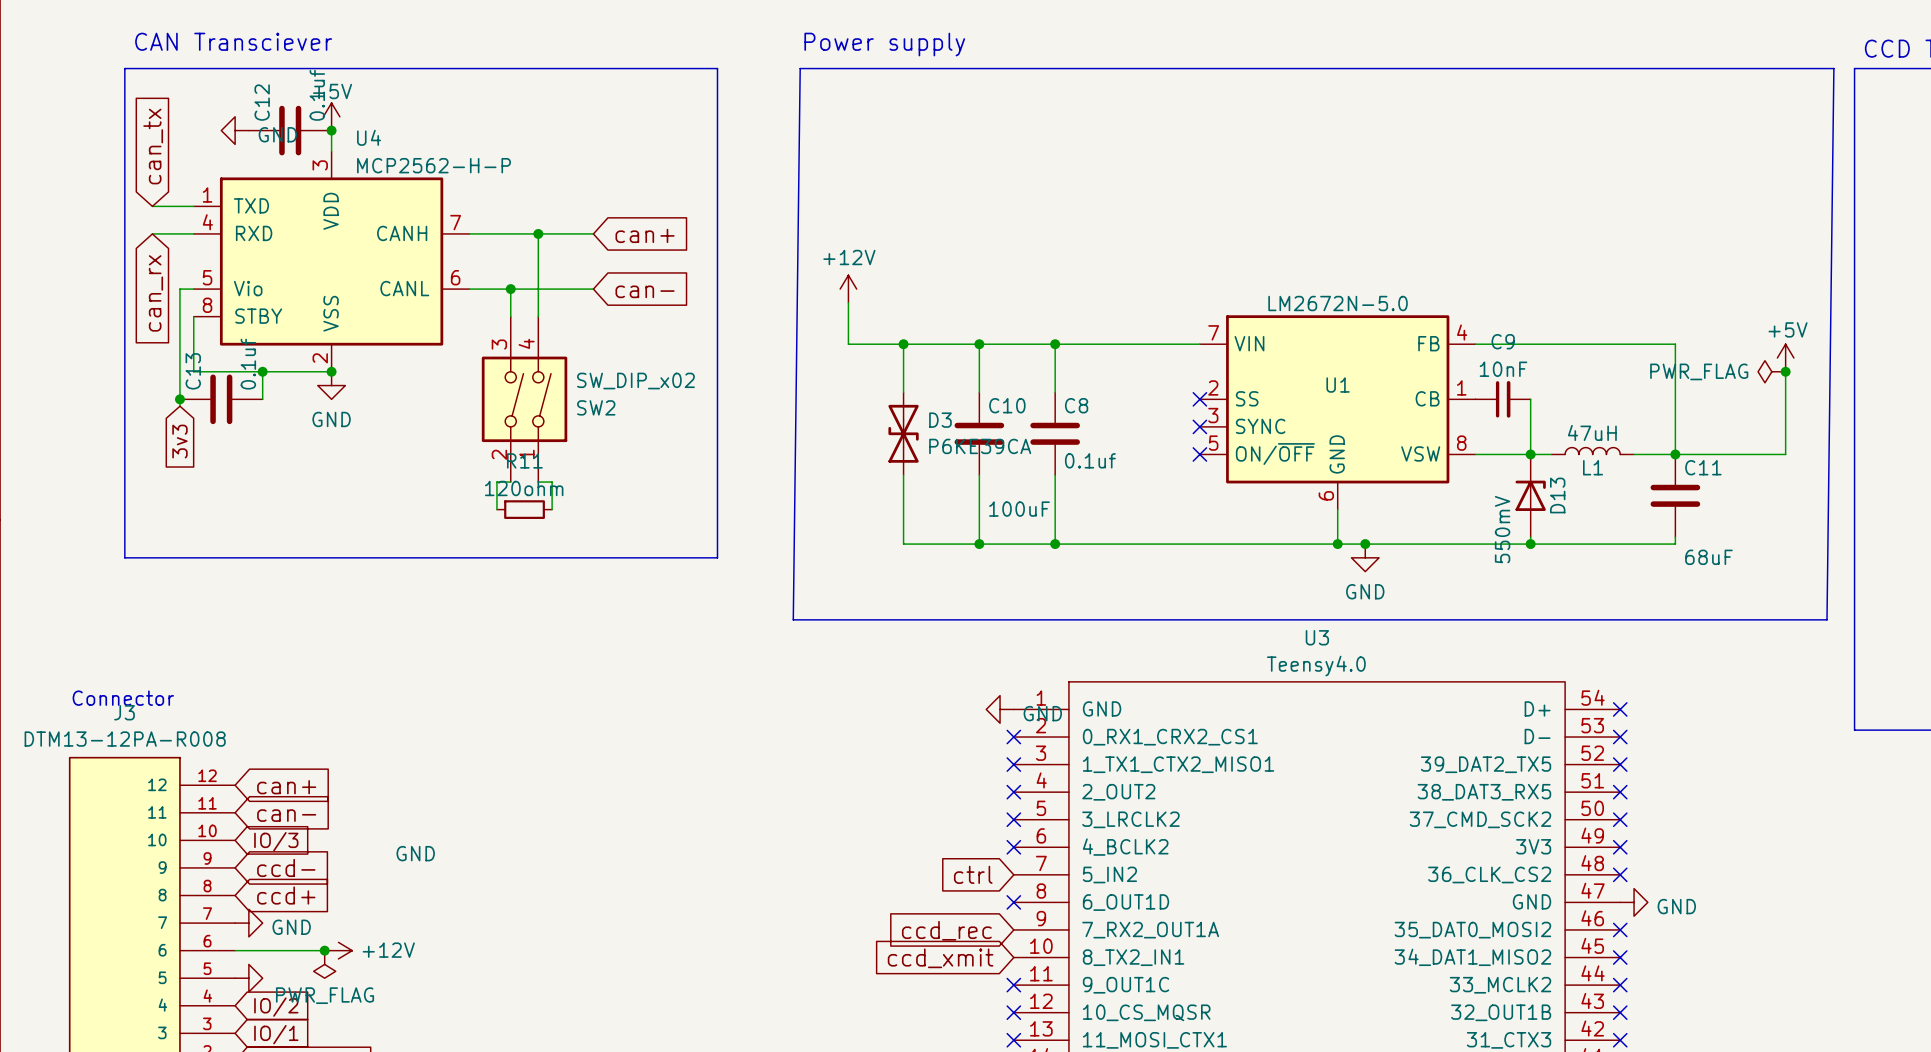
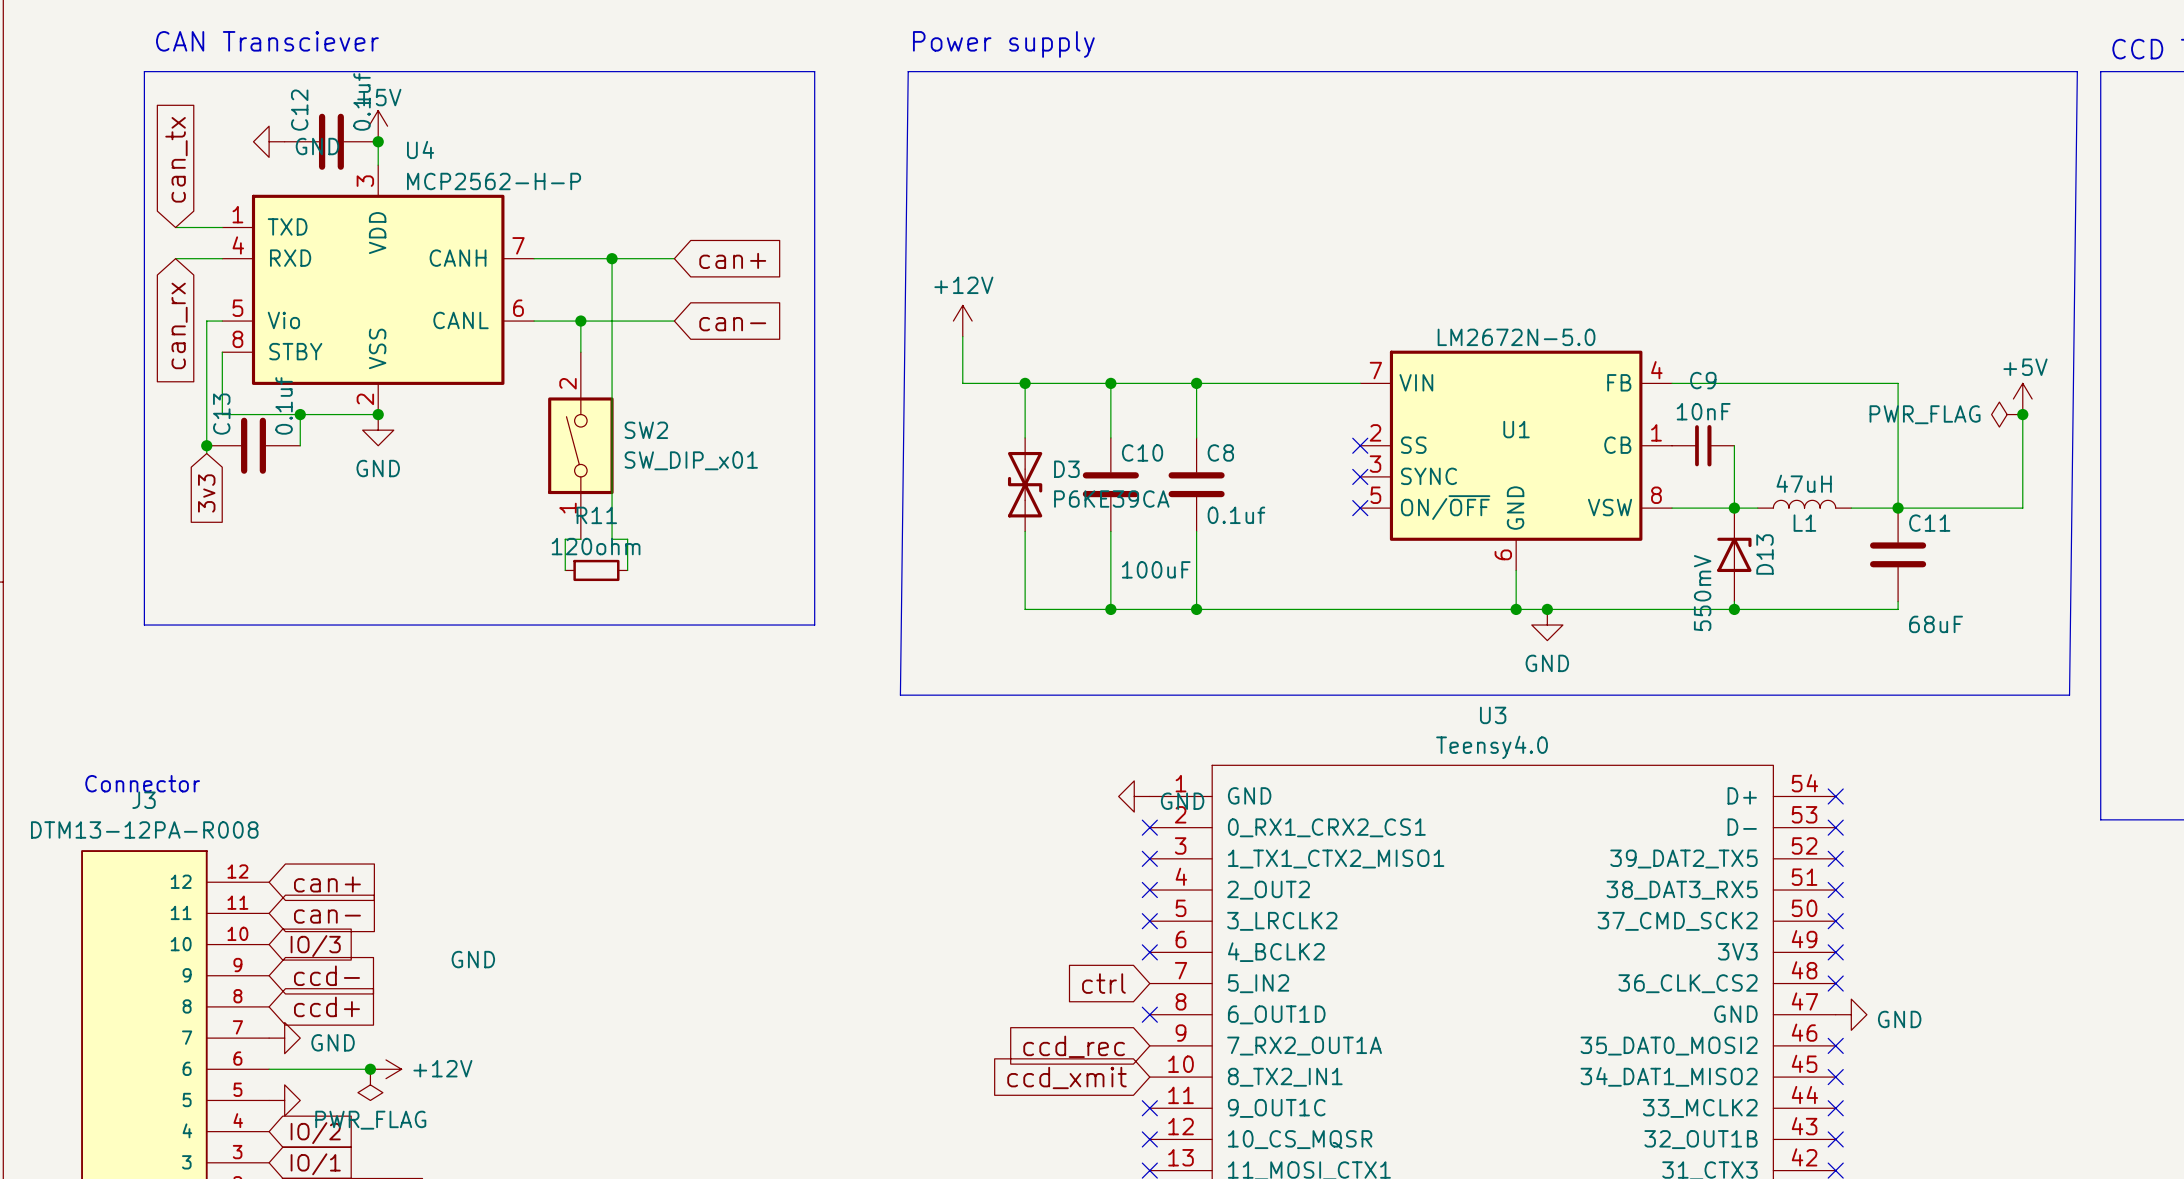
SW2 symbol: [481, 316, 568, 483] -> [548, 352, 614, 540]
SW2 value: SW_DIP_x02 (635, 381) -> SW_DIP_x01 (691, 460)
SW2 name position: SW2 (596, 407) -> SW2 (646, 430)

